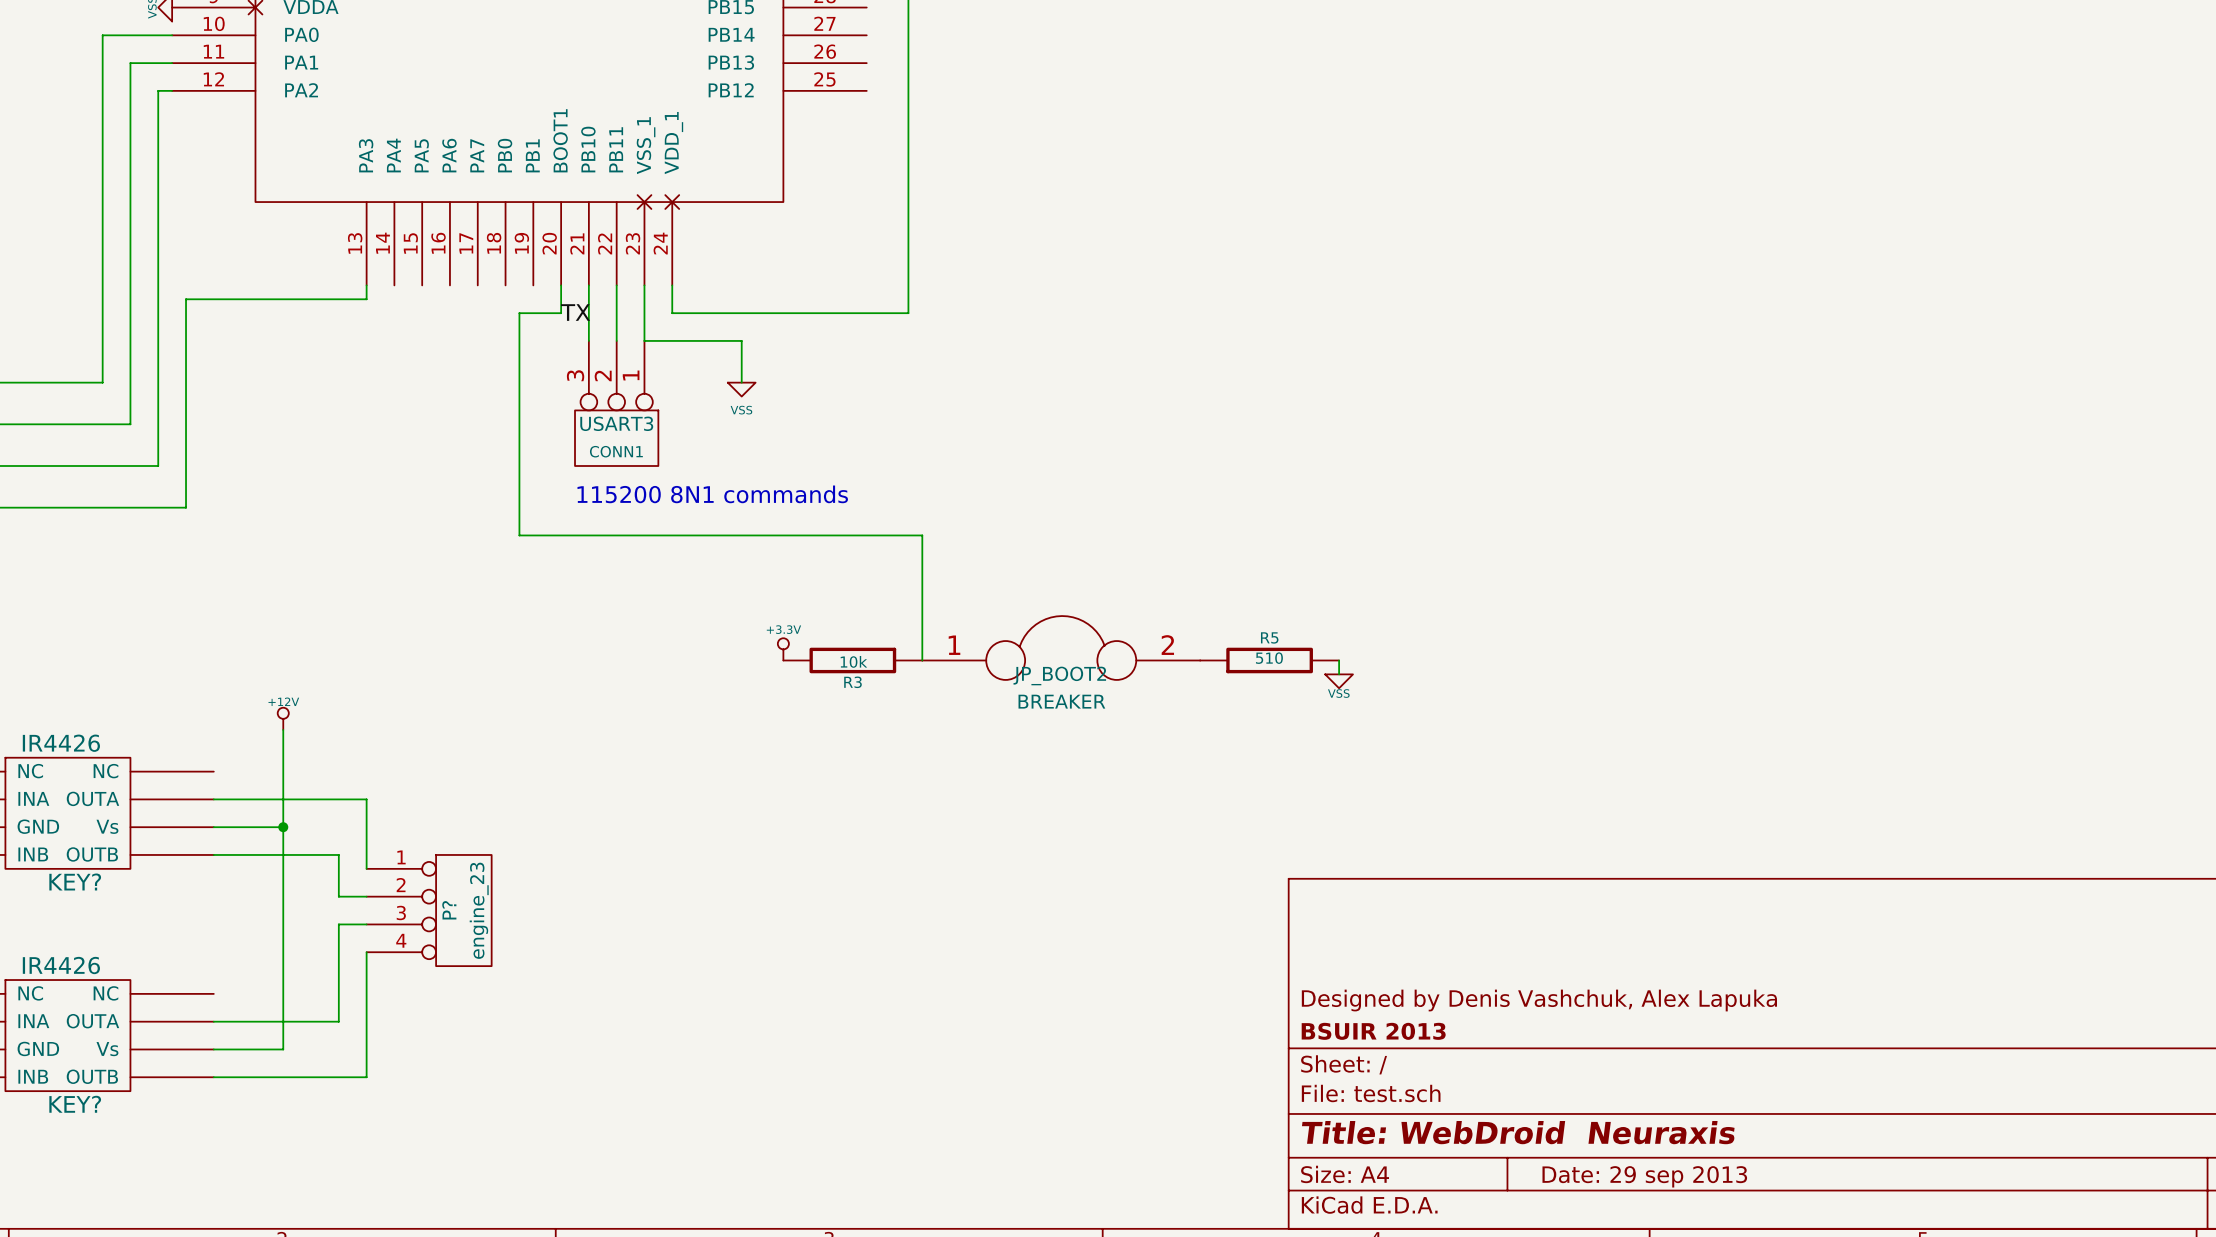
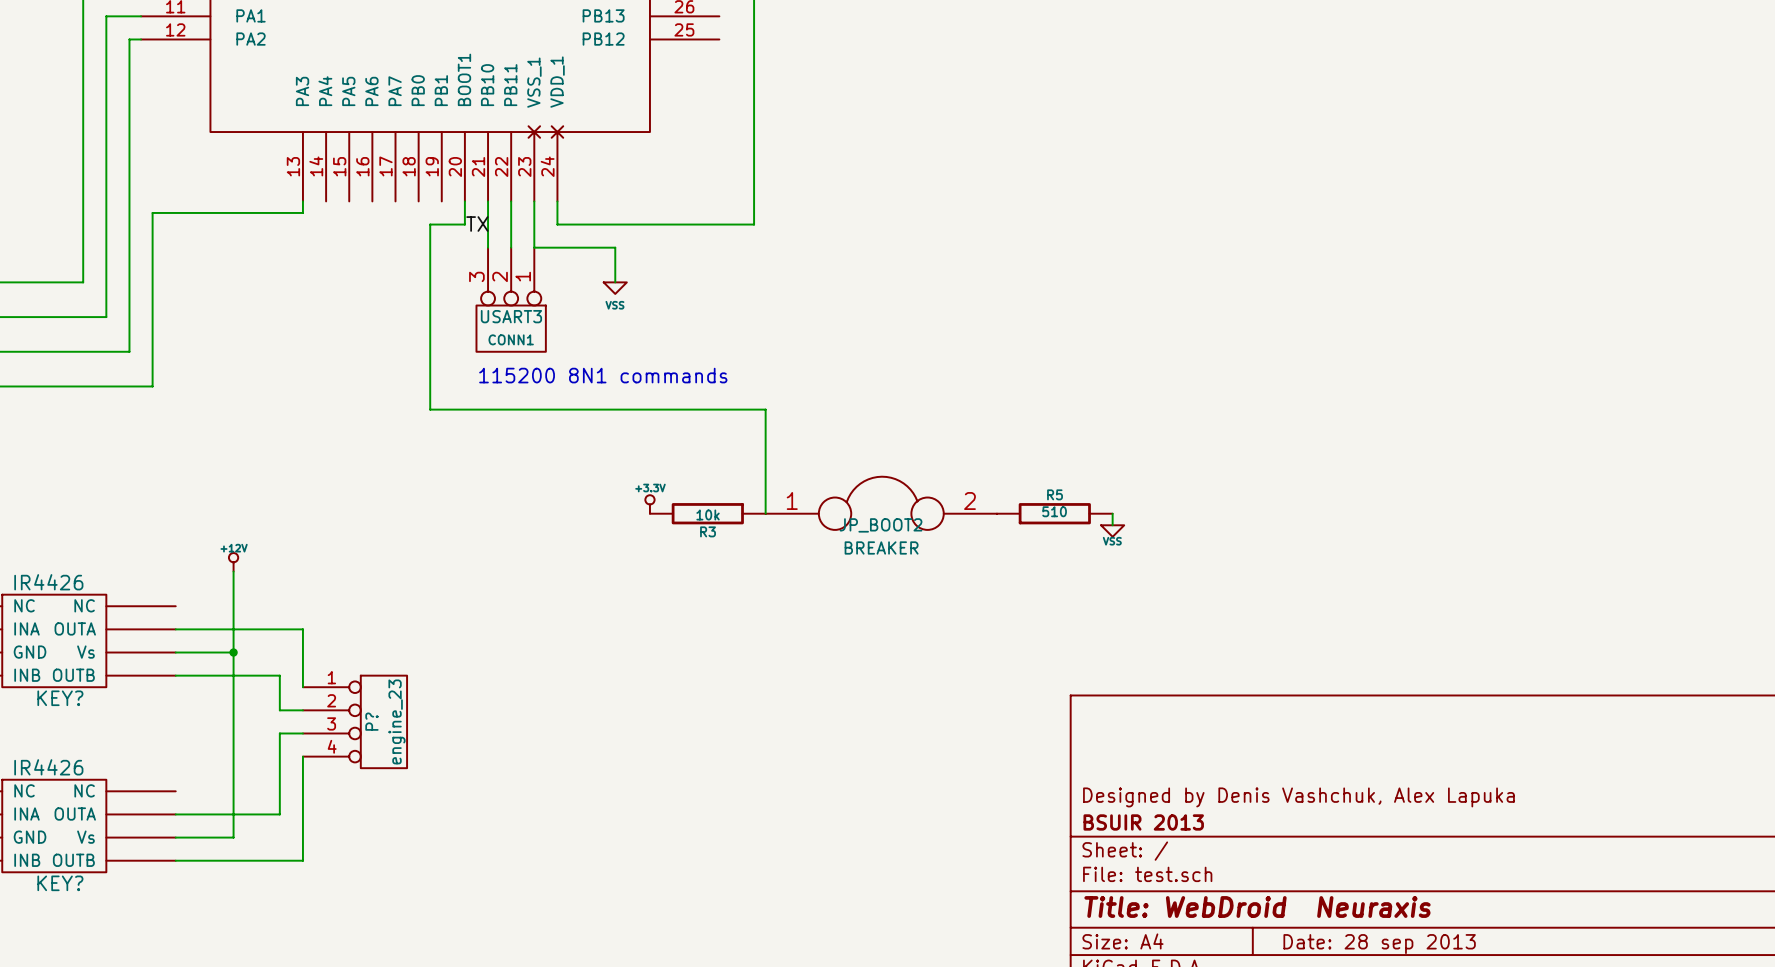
title block: Date: 29 sep 2013 (1644, 1176) -> Date: 28 sep 2013 (1379, 944)

